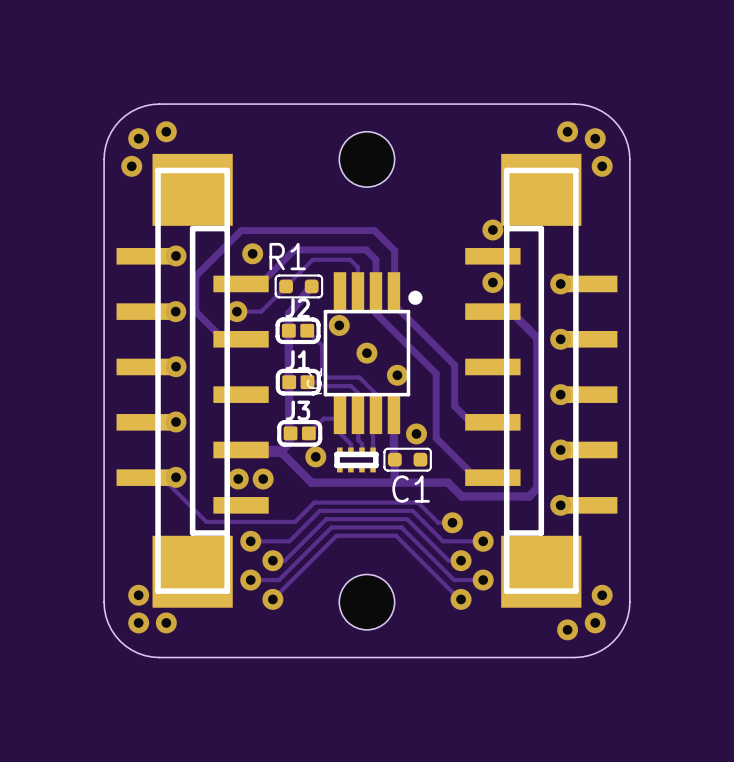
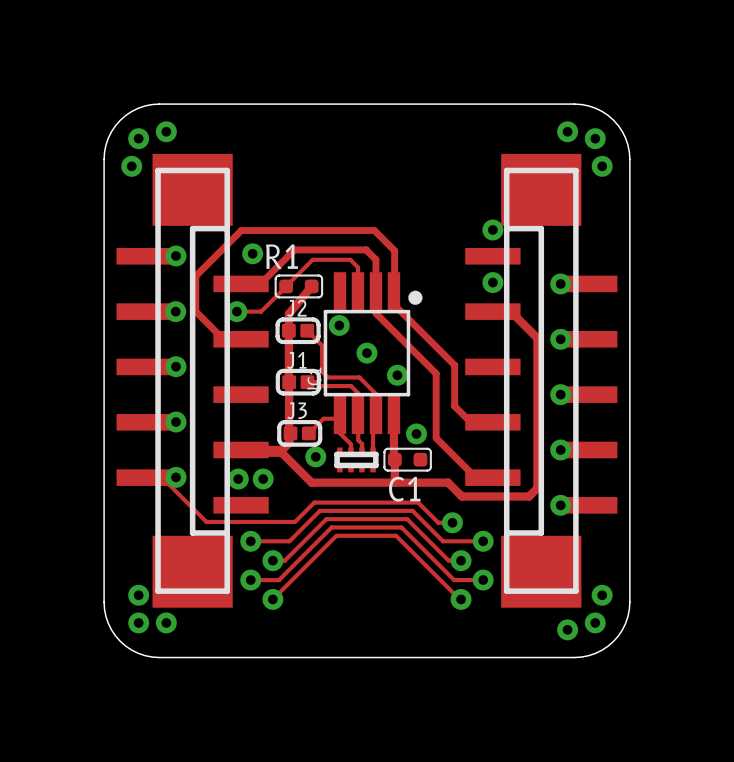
hole: (366, 159) -> none
hole: (366, 602) -> none

